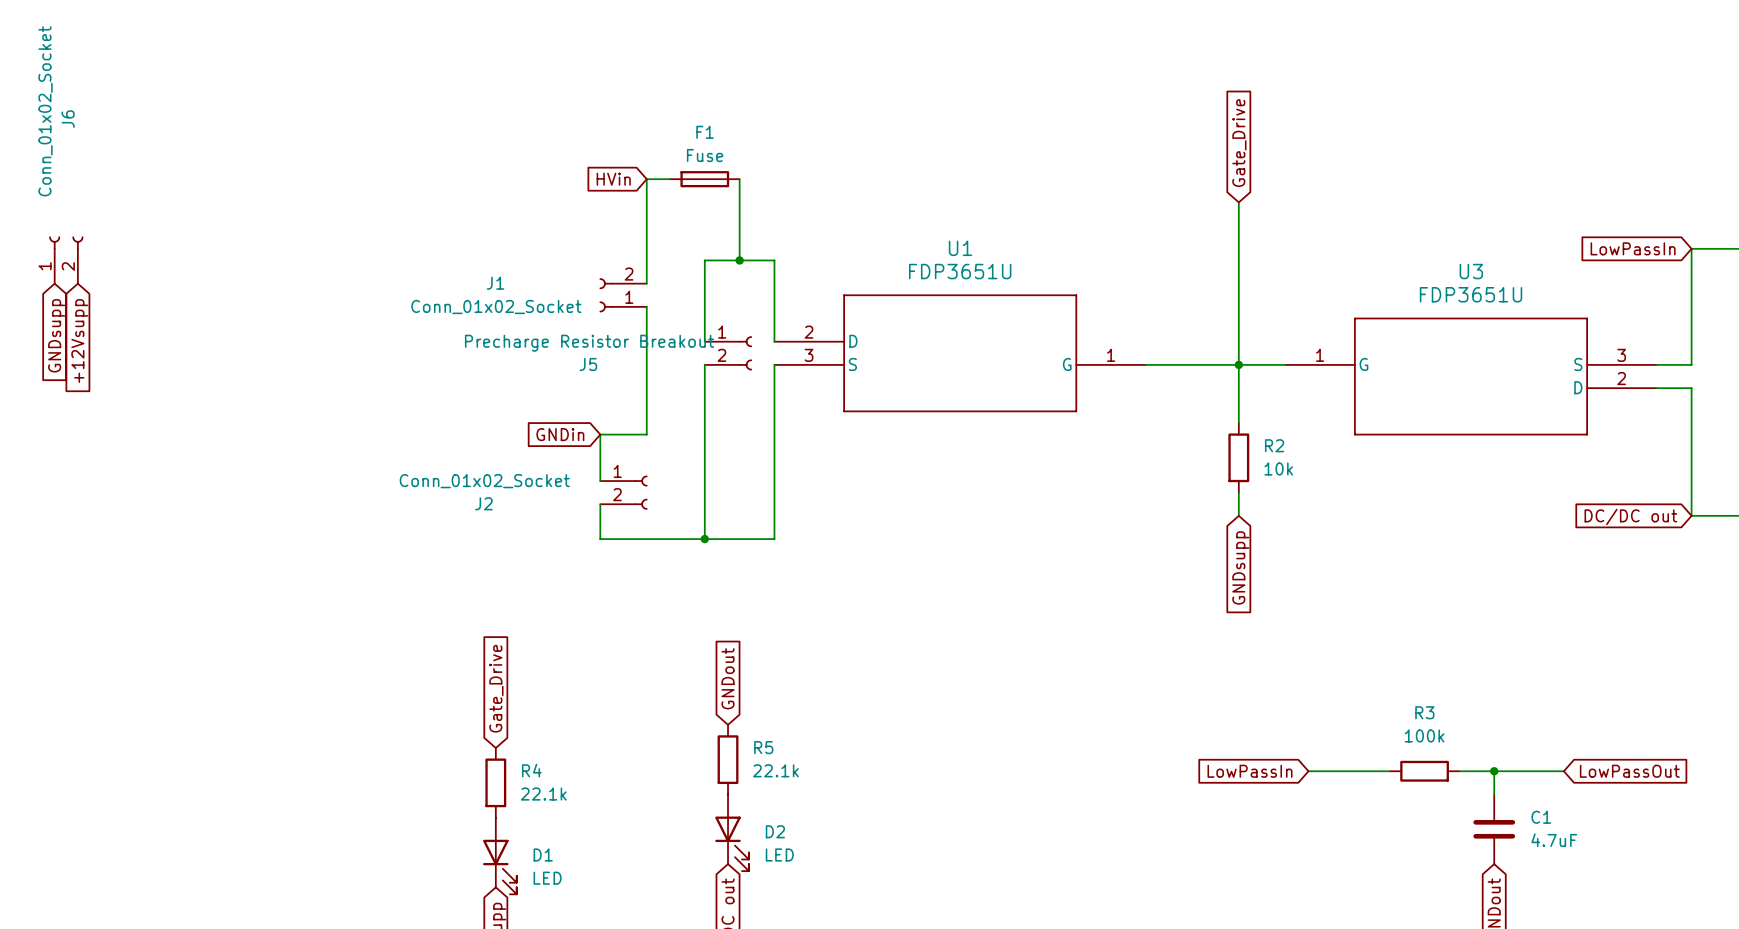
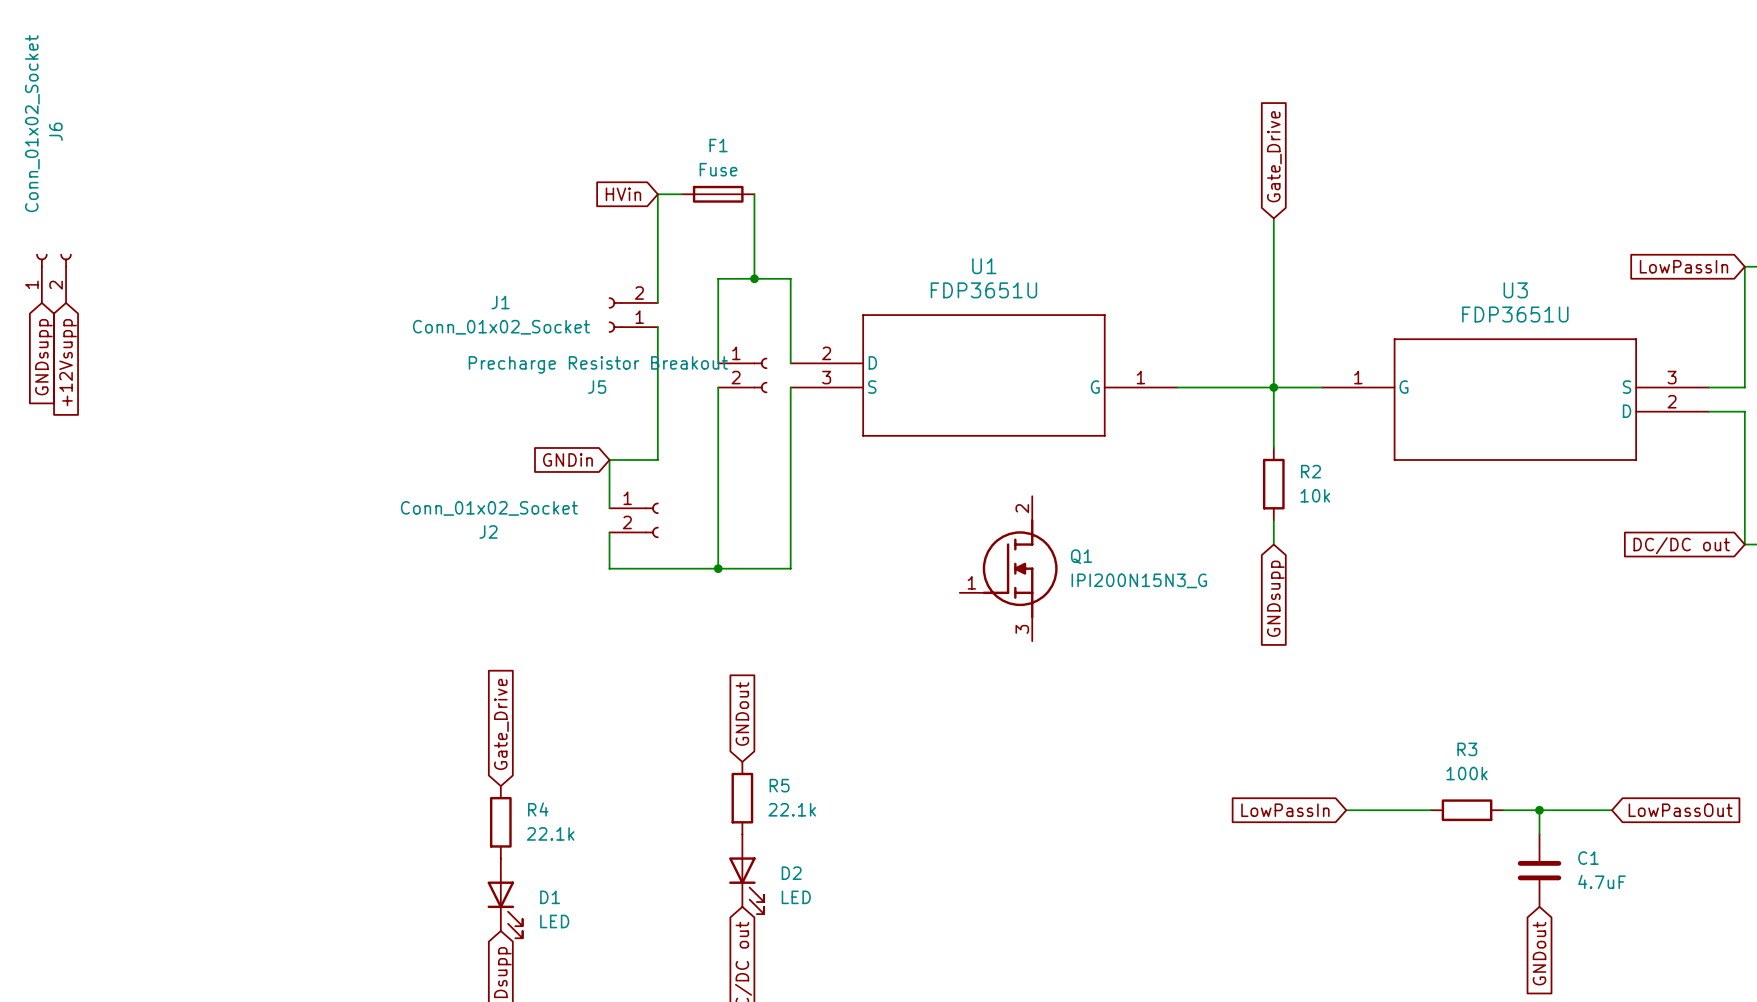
Q1: none -> IPI200N15N3_G (1008, 568)

